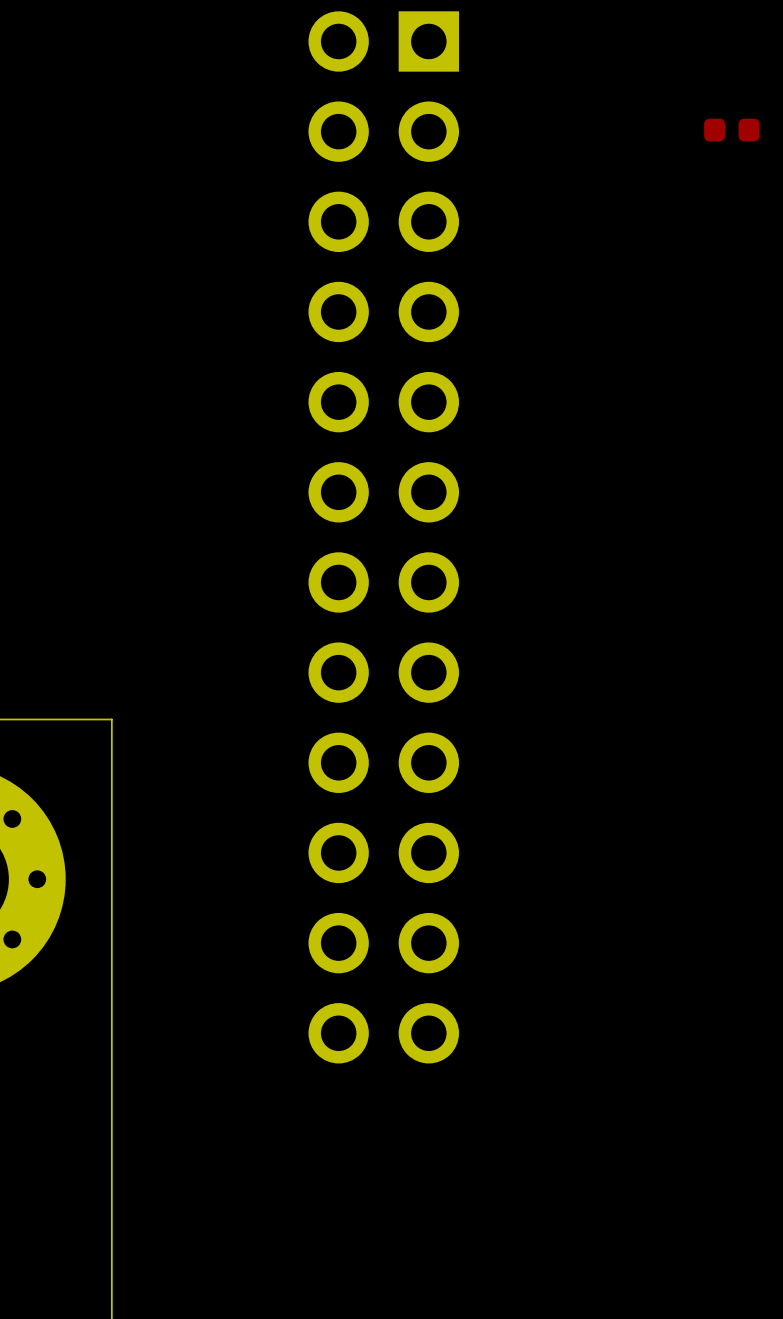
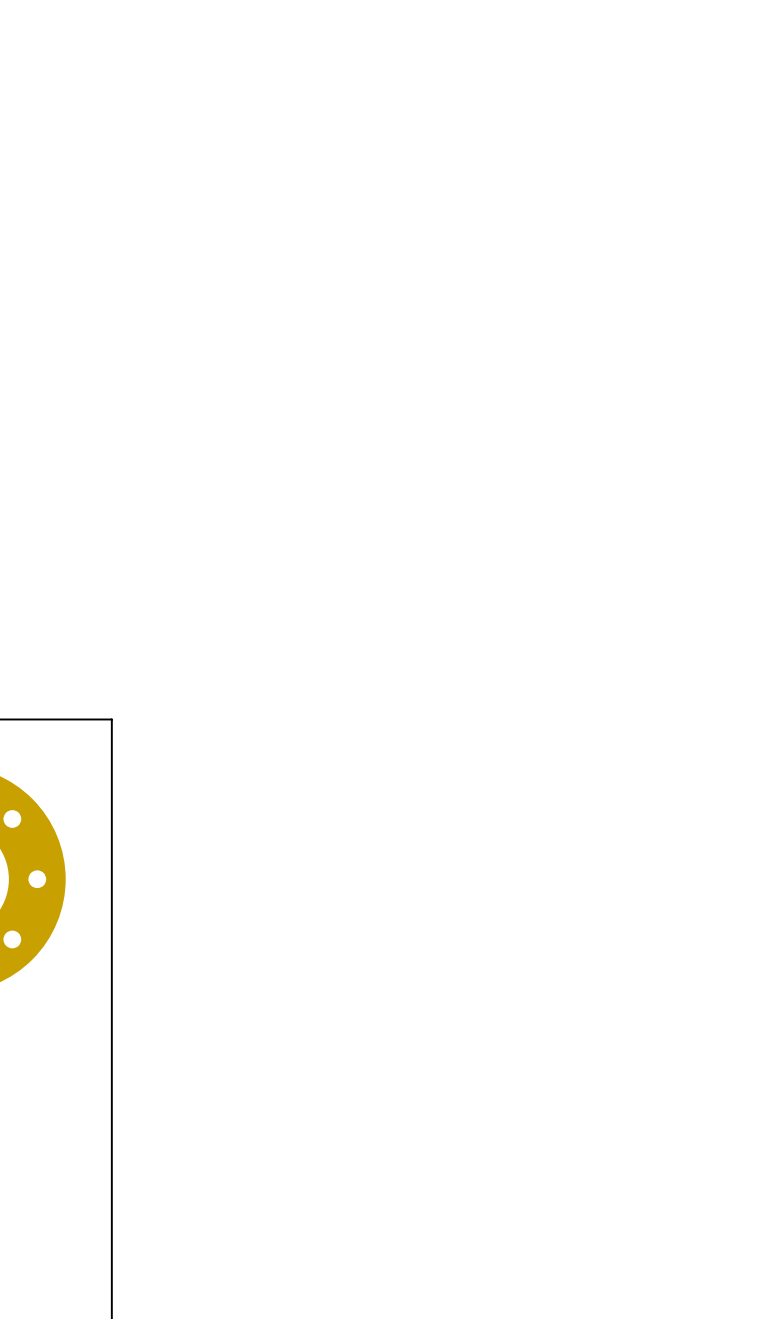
part: (731, 130) -> none
part: (383, 537) -> none

